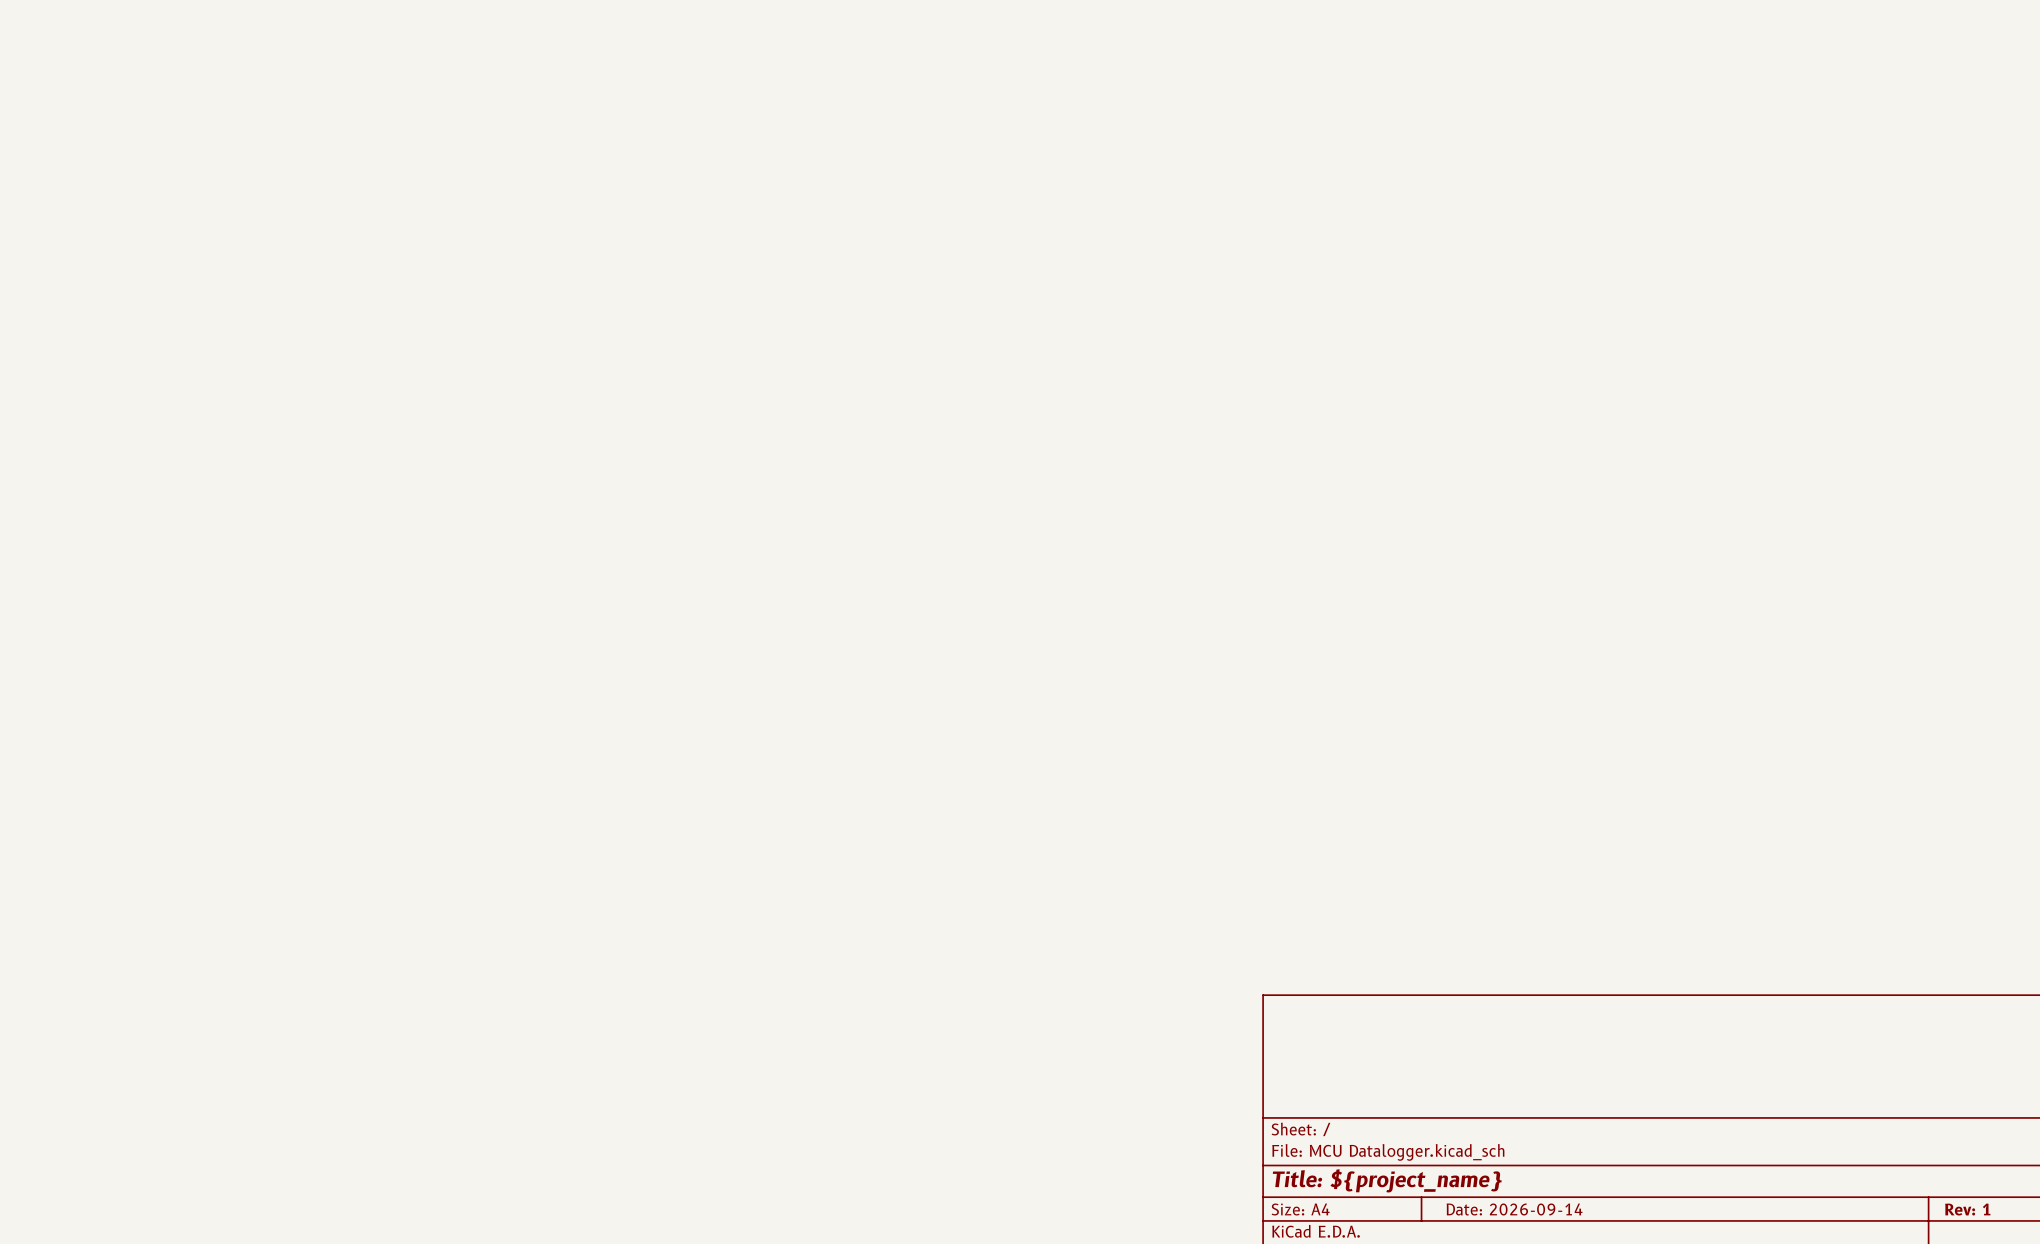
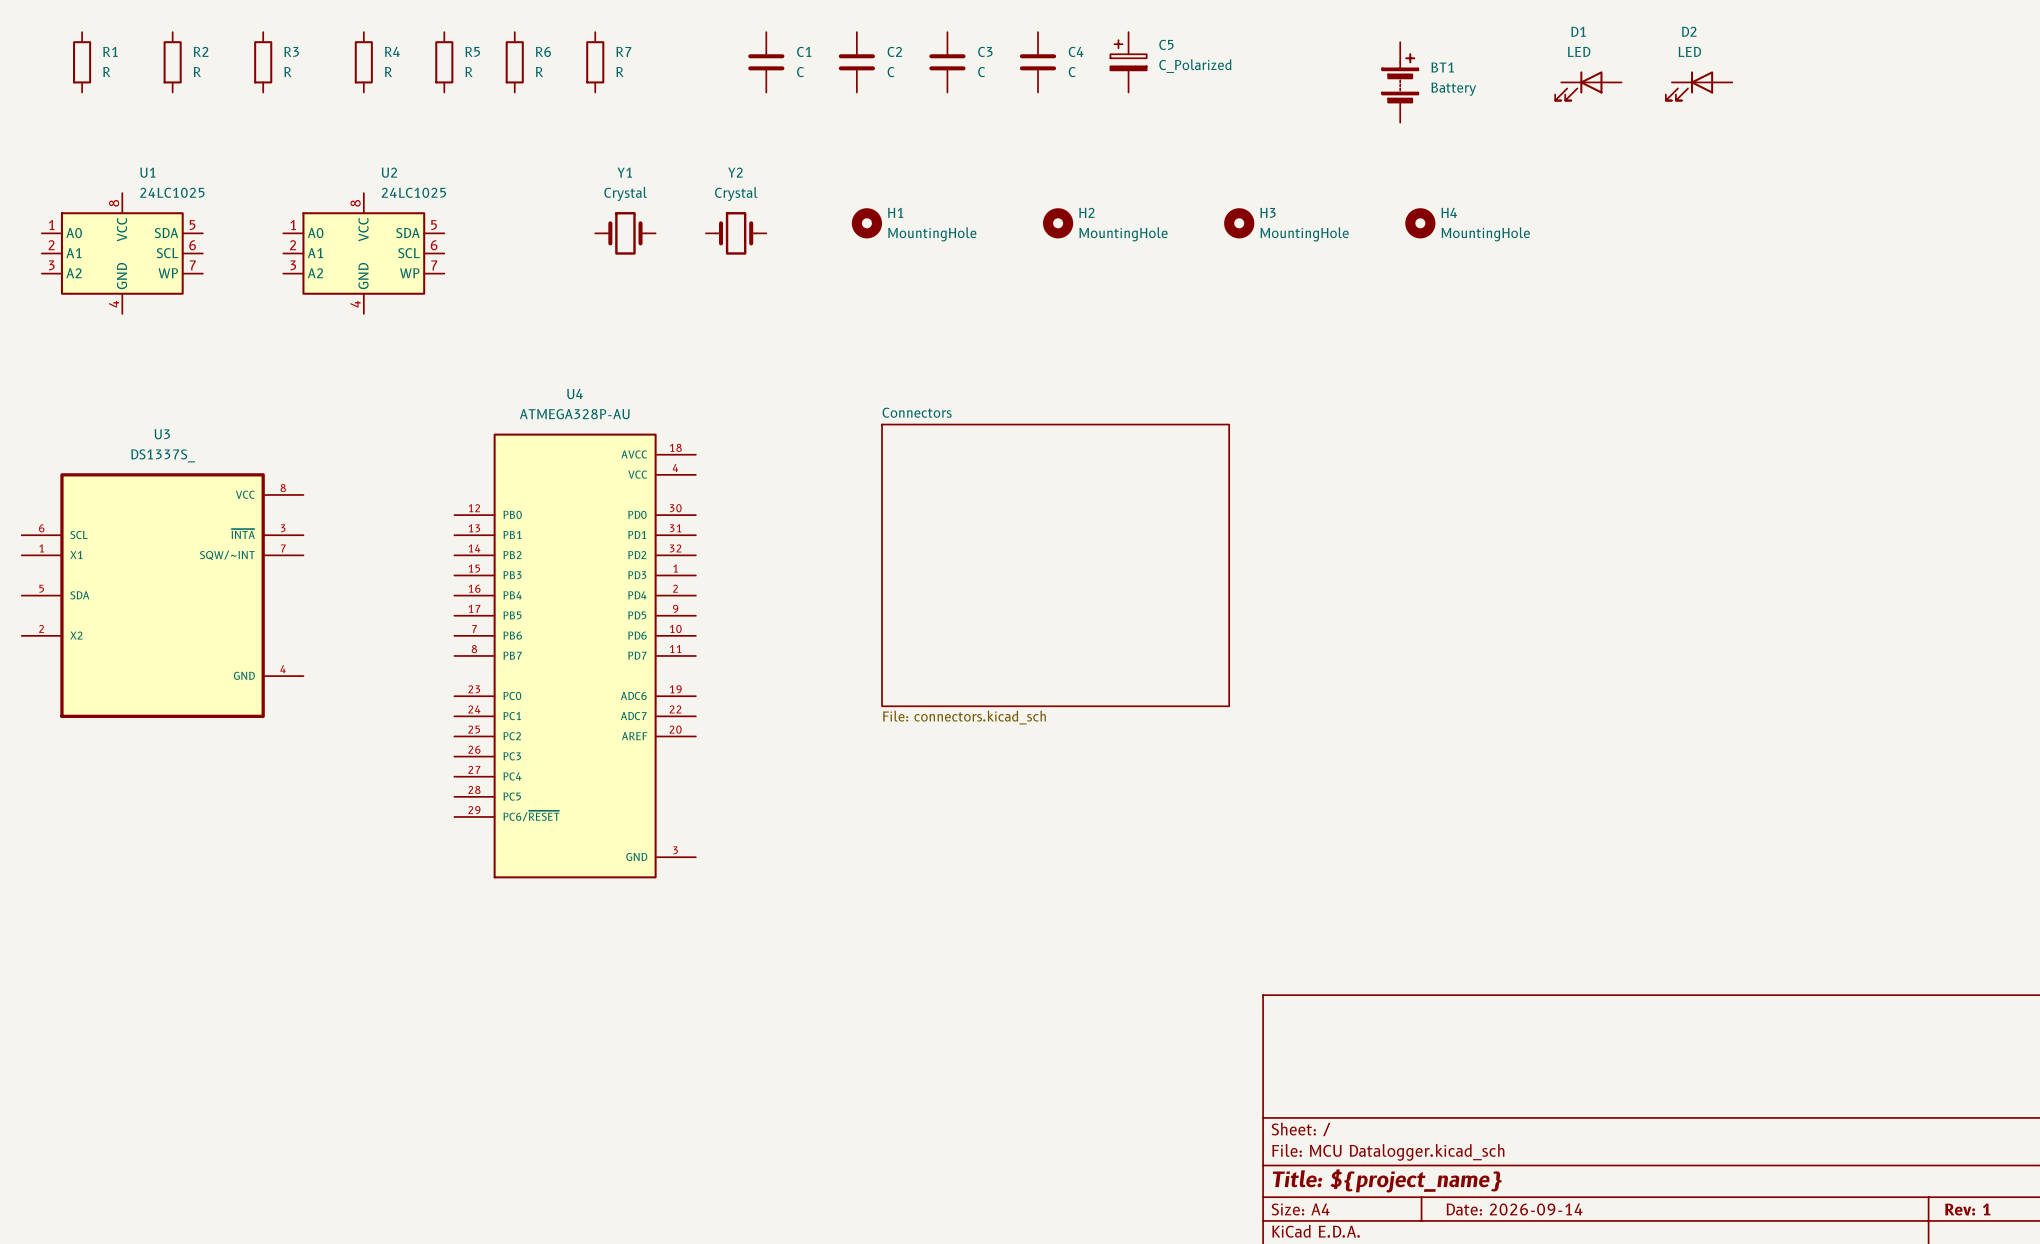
R1: none -> R (82, 62)
R2: none -> R (172, 62)
R3: none -> R (263, 62)
R4: none -> R (363, 62)
R5: none -> R (444, 62)
R6: none -> R (514, 62)
R7: none -> R (595, 62)
C1: none -> C (766, 62)
C2: none -> C (856, 62)
C3: none -> C (947, 62)
C4: none -> C (1037, 62)
C5: none -> C_Polarized (1128, 62)
BT1: none -> Battery (1400, 82)
D1: none -> LED (1588, 85)
D2: none -> LED (1699, 85)
H1: none -> MountingHole (866, 223)
H2: none -> MountingHole (1058, 223)
H3: none -> MountingHole (1239, 223)
H4: none -> MountingHole (1420, 223)
Y1: none -> Crystal (625, 233)
Y2: none -> Crystal (736, 233)
U1: none -> 24LC1025 (122, 253)
U2: none -> 24LC1025 (363, 253)
sheet Connectors: none -> File: connectors.kicad_sch (1055, 565)
U3: none -> DS1337S_ (162, 595)
U4: none -> ATMEGA328P-AU (575, 655)

